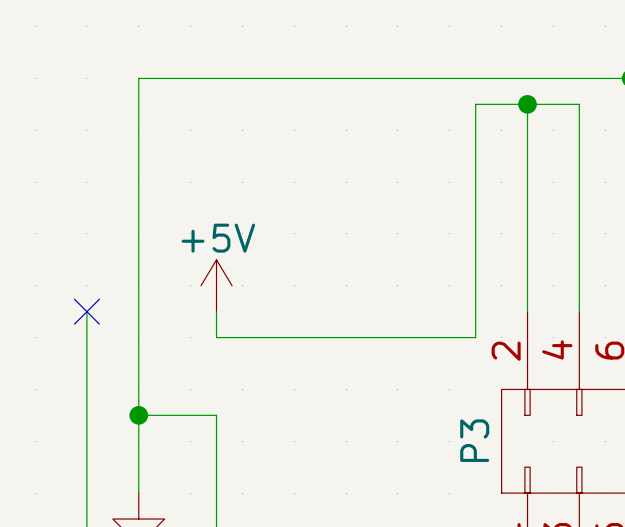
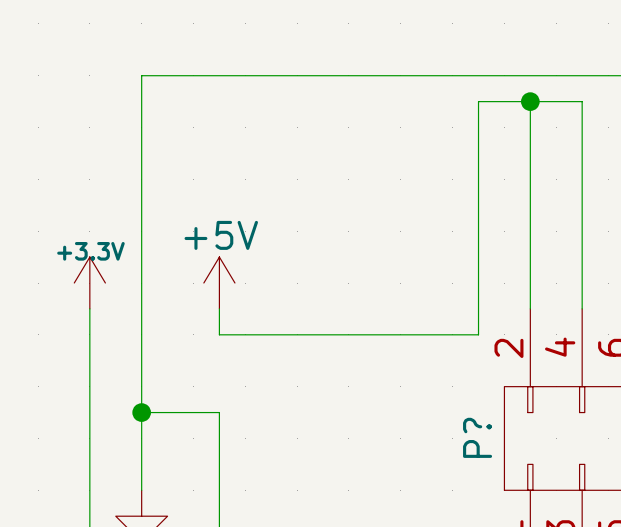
power symbol: none -> +3.3V (89, 283)
no-connect mark: (86, 311) -> none
P3 name: P3 (474, 440) -> P? (477, 437)

